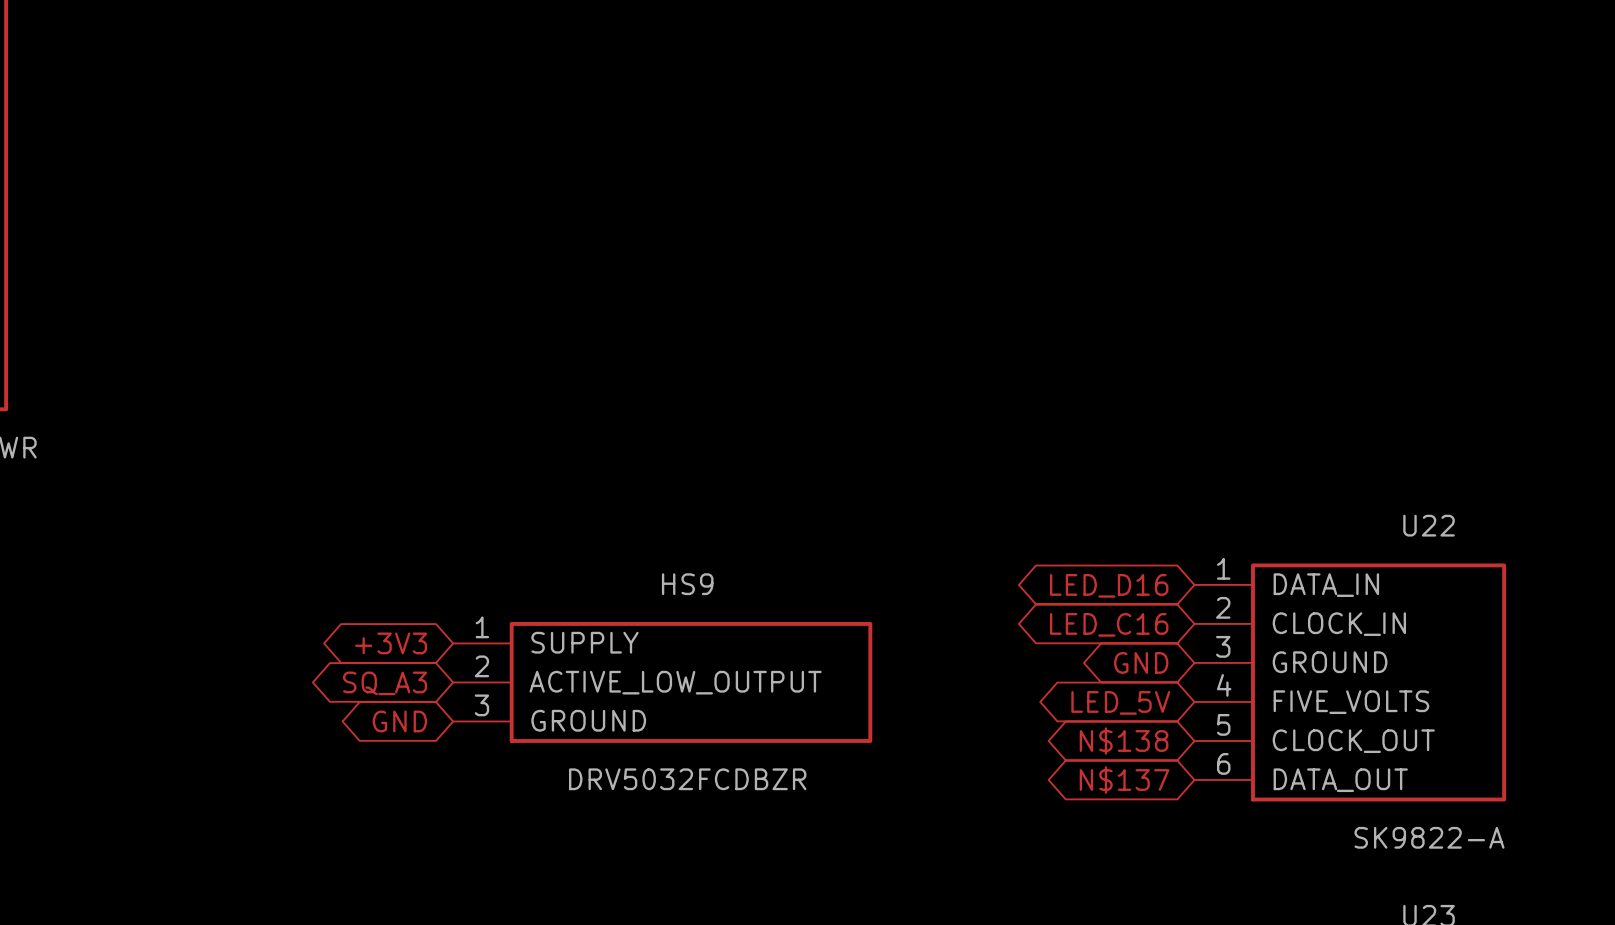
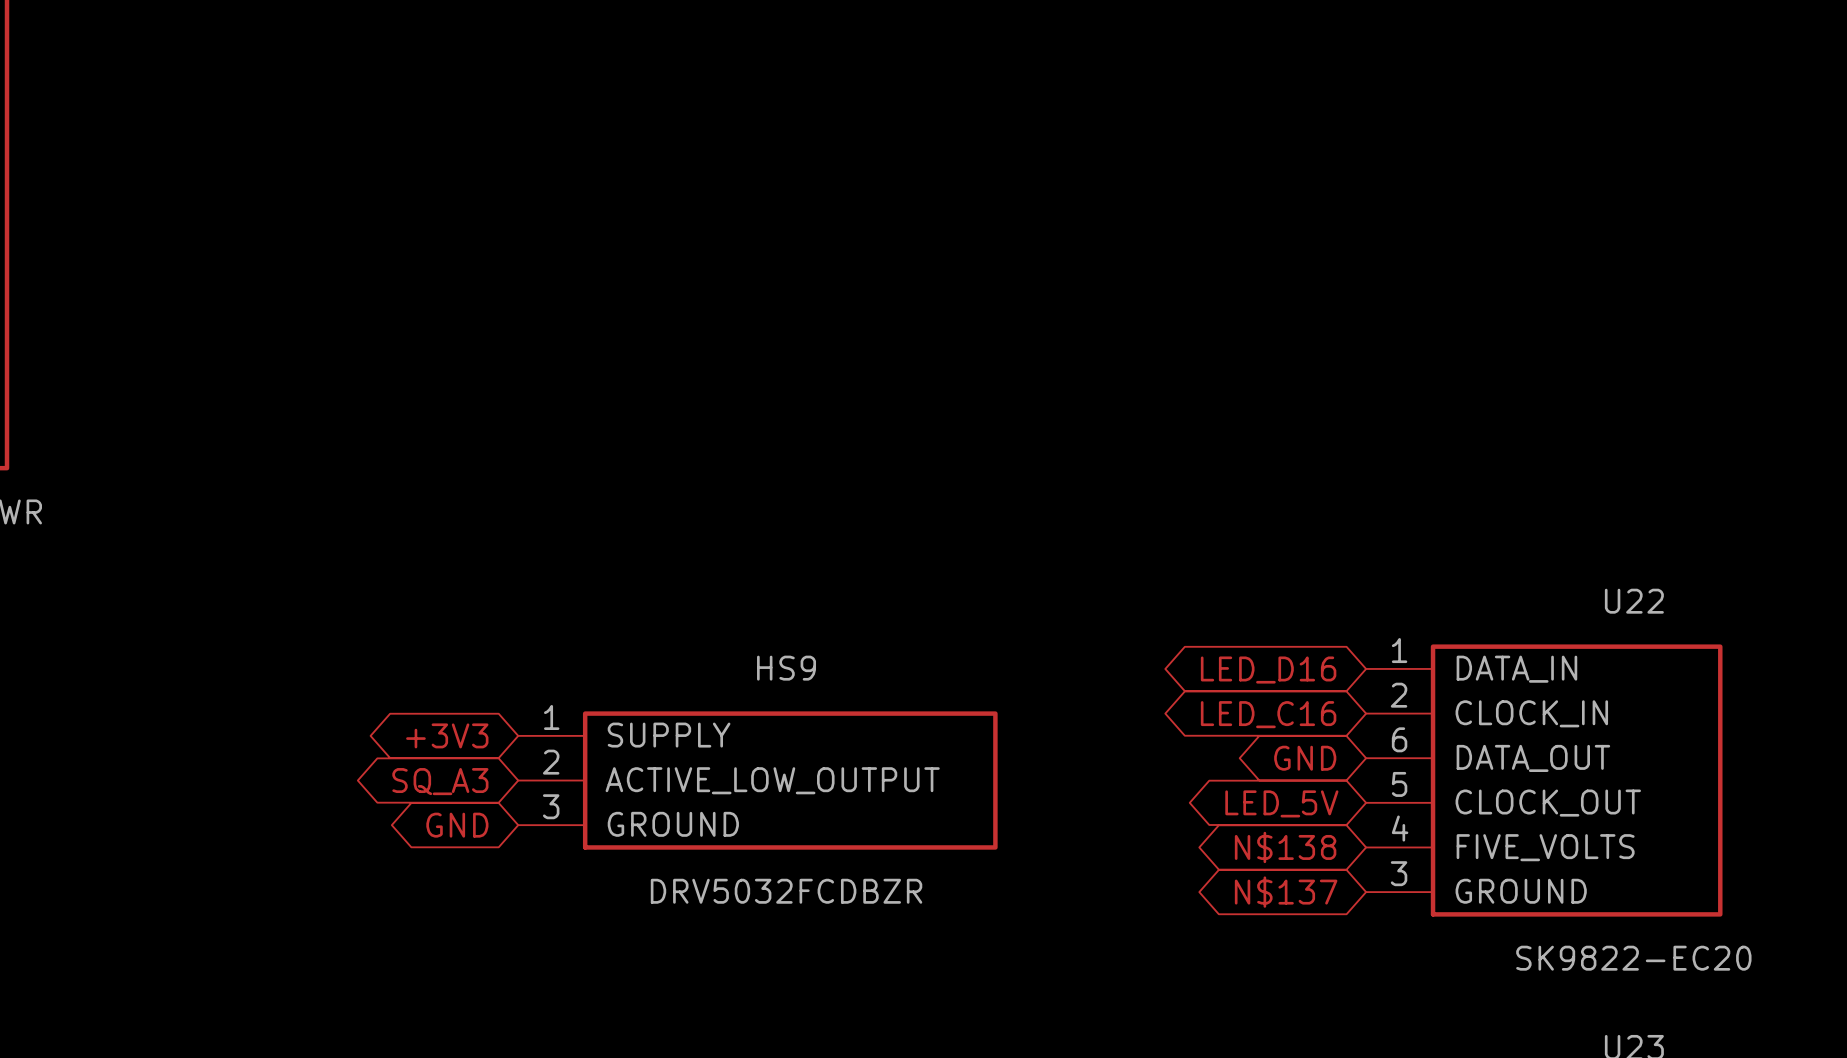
U22 pin number: 3 (1223, 646) -> 6 (1399, 739)
U22 pin name: GROUND (1330, 662) -> DATA_OUT (1533, 758)
U22 pin number: 4 (1224, 685) -> 5 (1399, 784)
U22 pin name: FIVE_VOLTS (1351, 702) -> CLOCK_OUT (1548, 803)
U22 pin number: 5 (1223, 724) -> 4 (1400, 828)
U22 pin name: CLOCK_OUT (1353, 741) -> FIVE_VOLTS (1545, 847)
U22 pin number: 6 (1223, 763) -> 3 (1399, 873)
U22 pin name: DATA_OUT (1340, 780) -> GROUND (1521, 891)
U22 value: SK9822-A (1429, 837) -> SK9822-EC20 (1633, 958)

